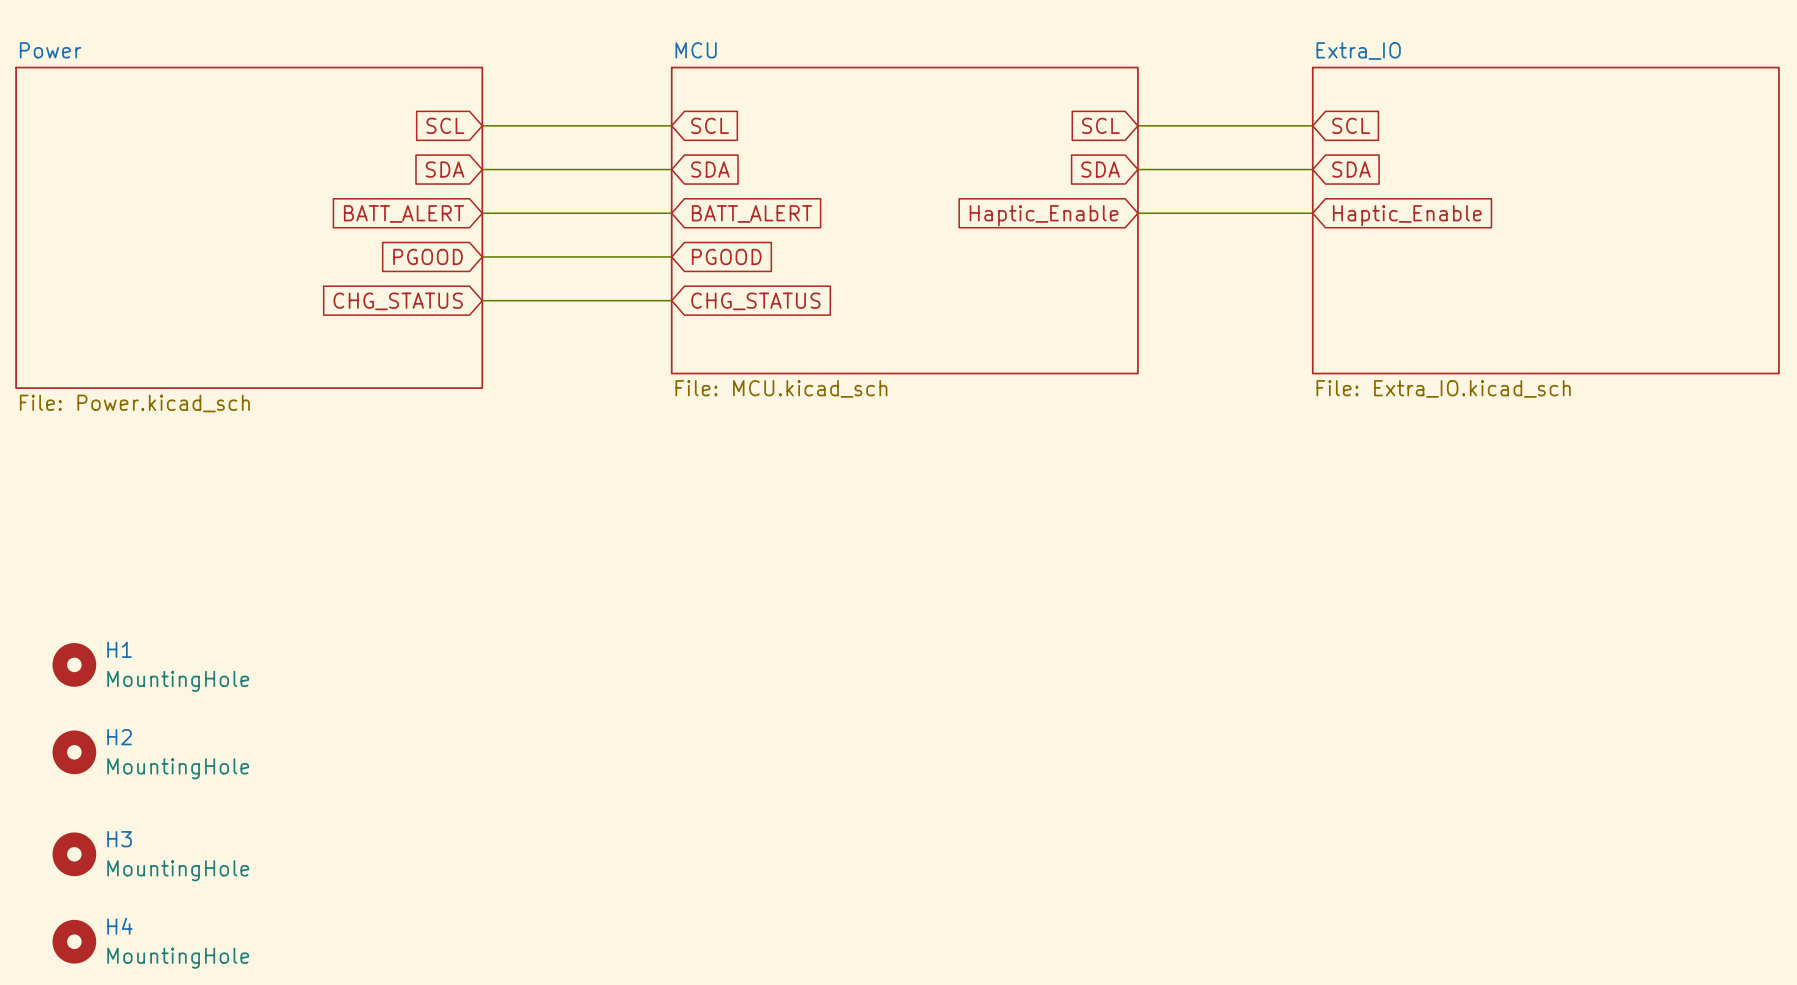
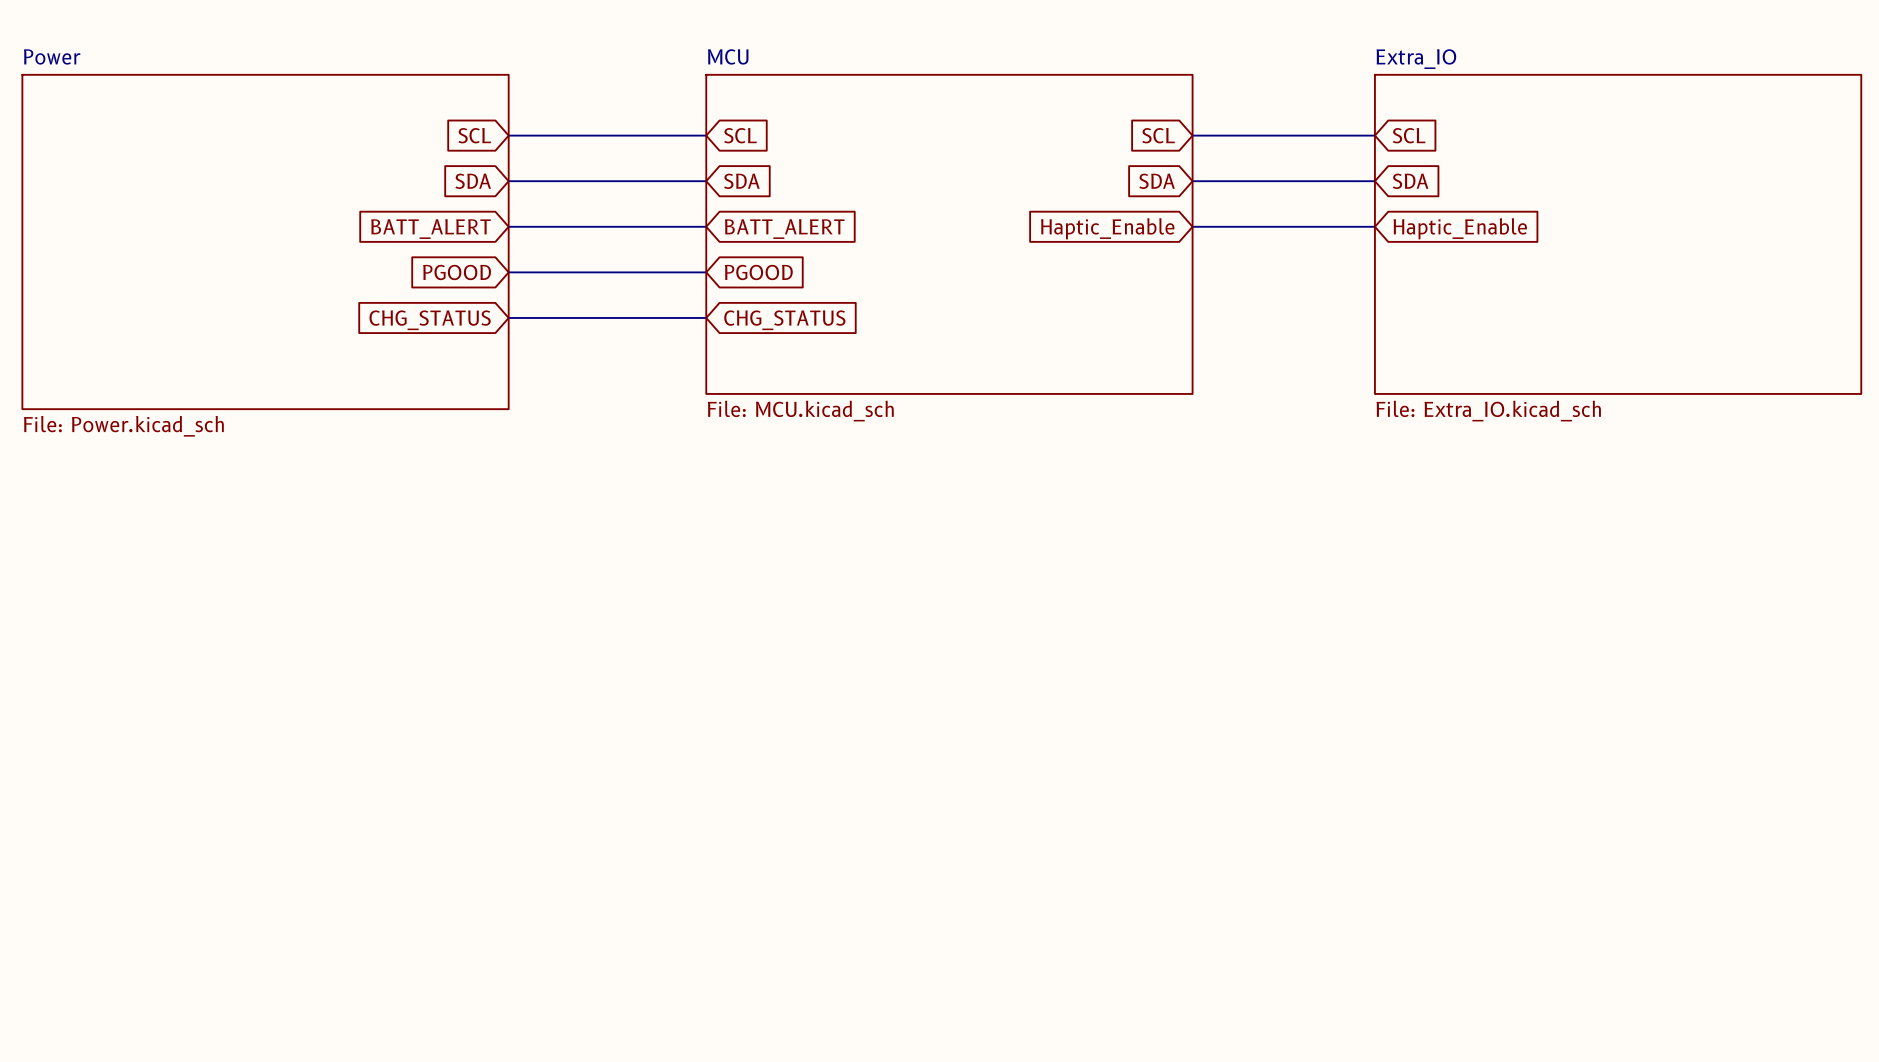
H1: MountingHole (74, 664) -> none
H2: MountingHole (74, 752) -> none
H3: MountingHole (74, 854) -> none
H4: MountingHole (74, 941) -> none

